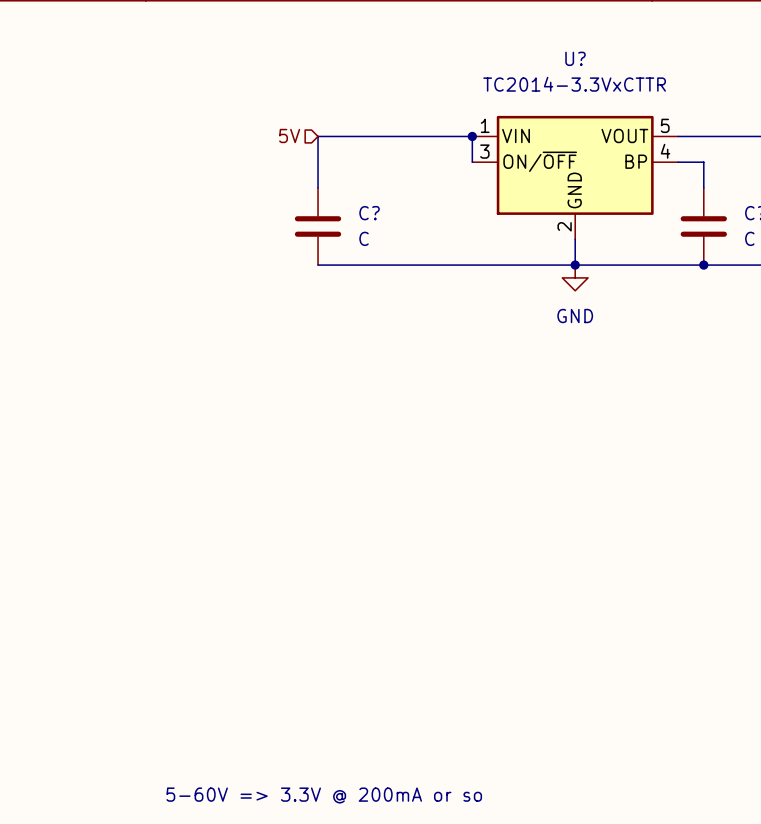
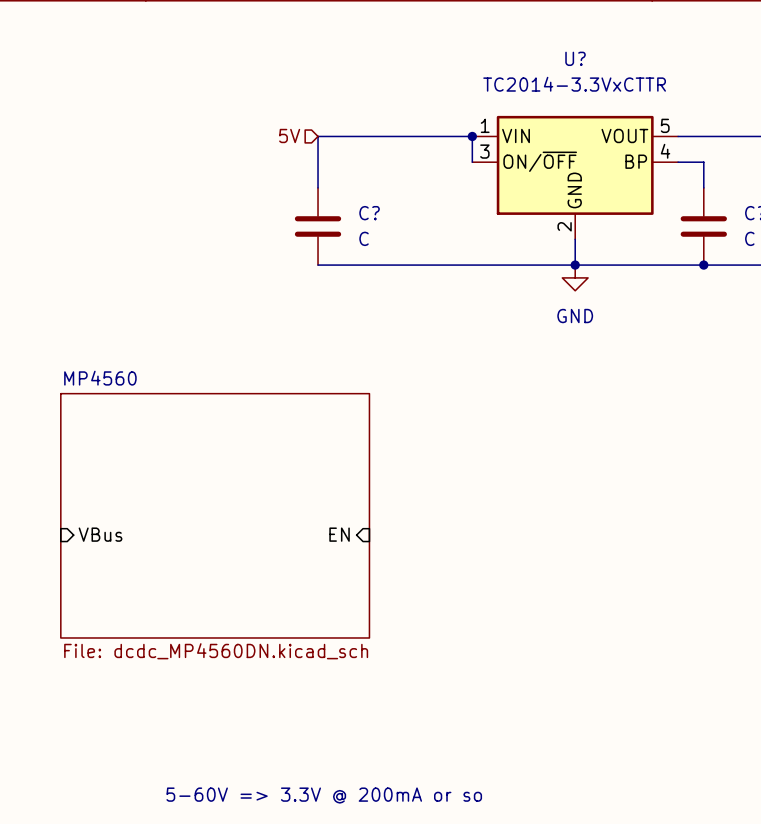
sheet MP4560: none -> File: dcdc_MP4560DN.kicad_sch (215, 515)
sheet pin: none -> VBus (100, 534)
sheet pin: none -> EN (339, 534)

